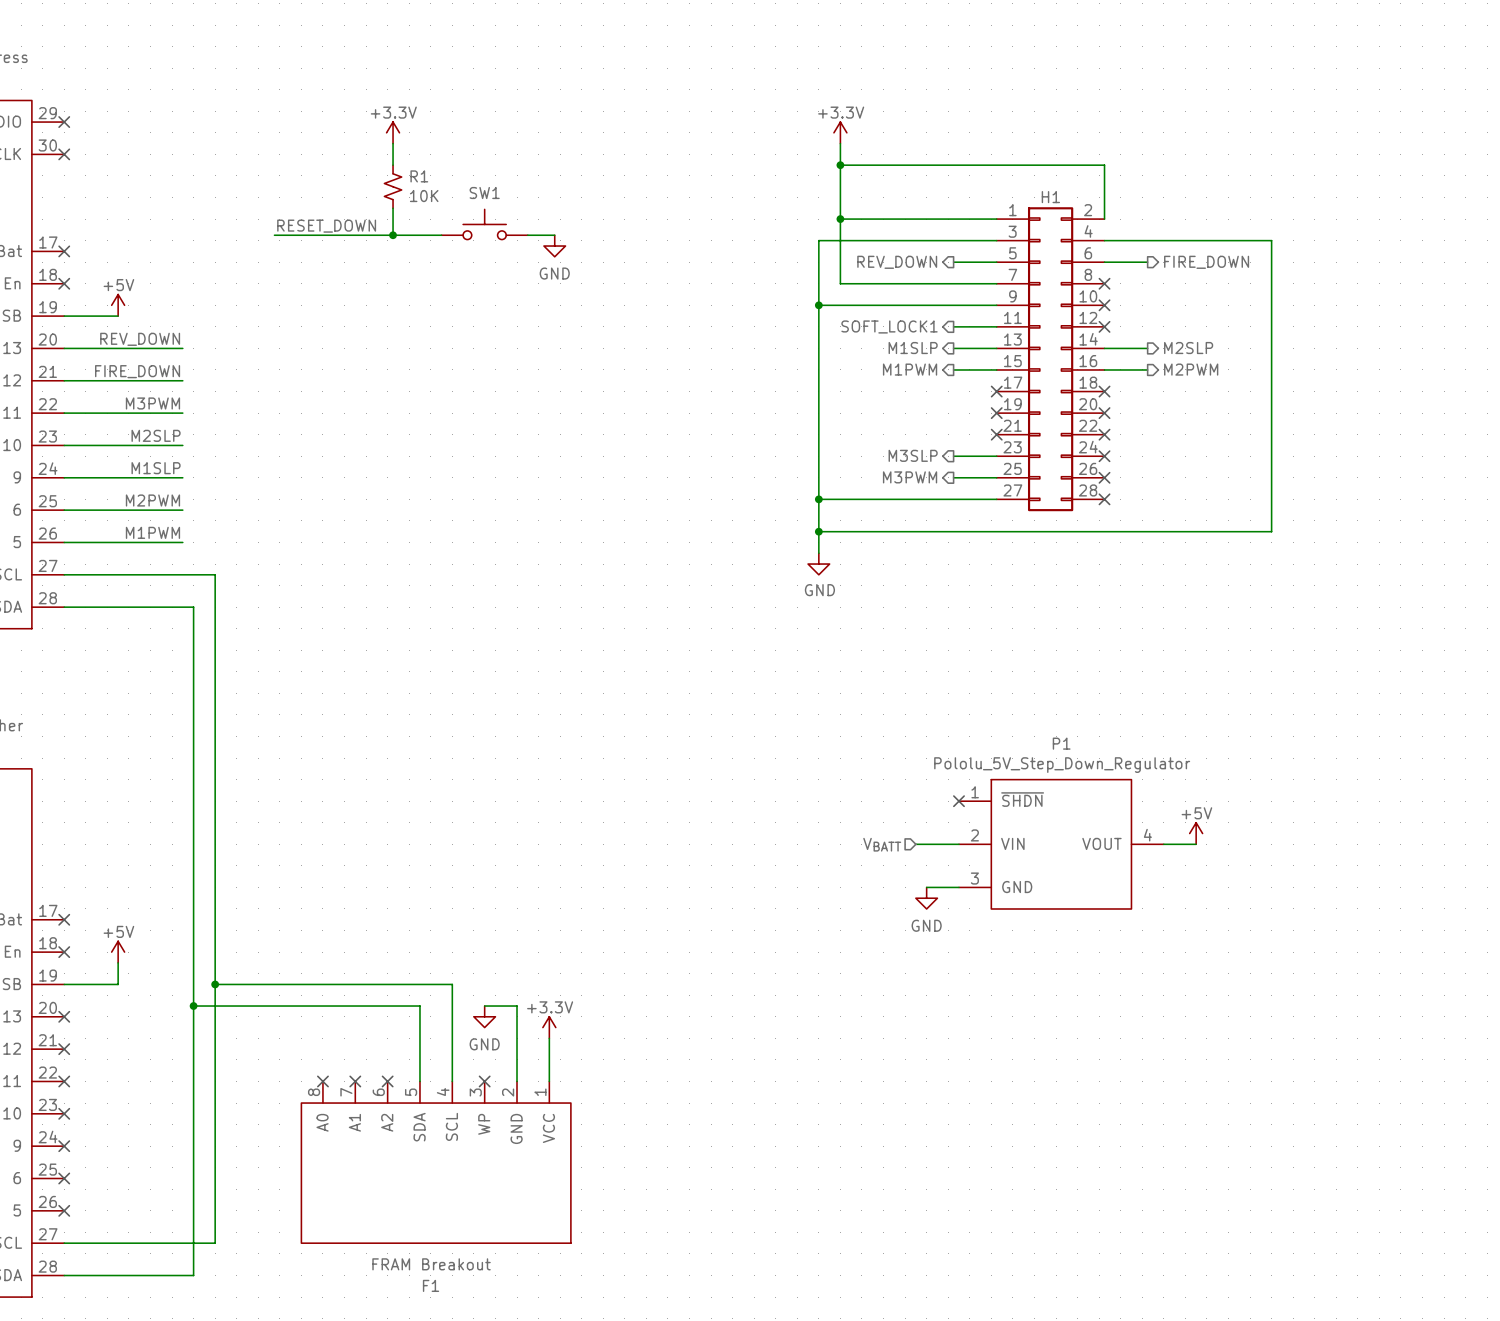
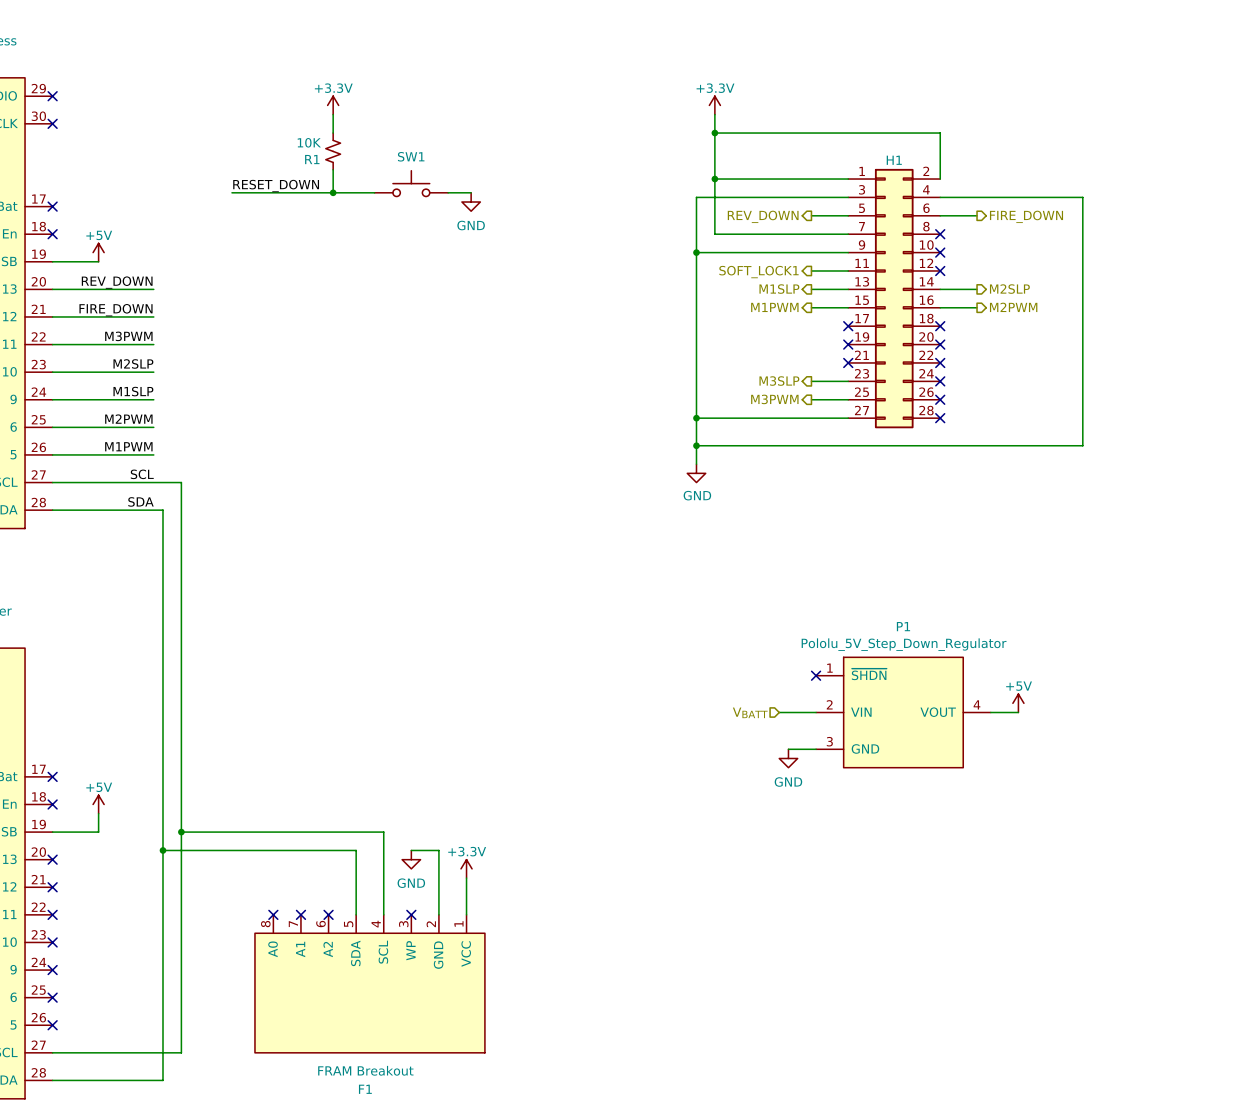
R1 name position: R1 (419, 176) -> R1 (312, 159)
R1 value position: 10K (424, 196) -> 10K (309, 142)
label: none -> SCL (142, 474)
label: none -> SDA (140, 501)

